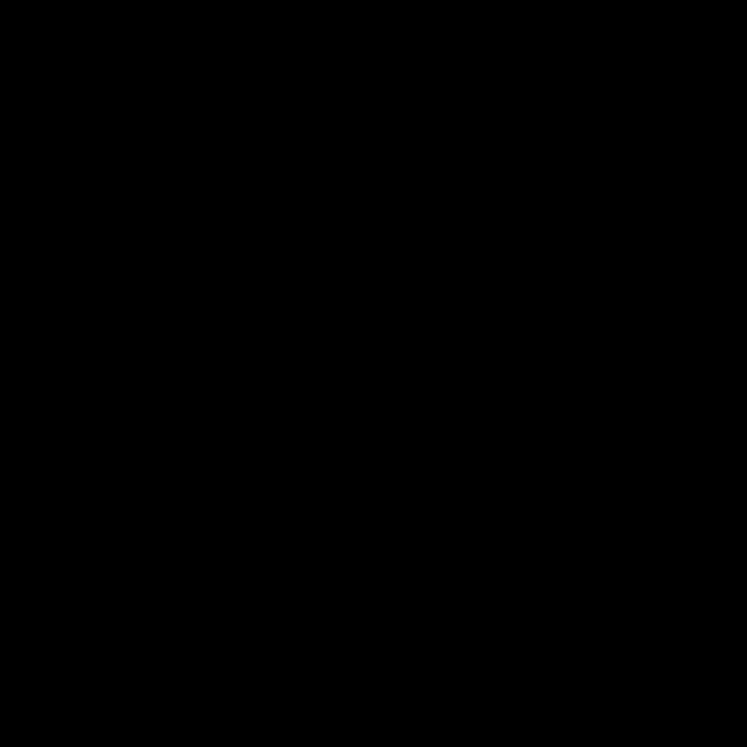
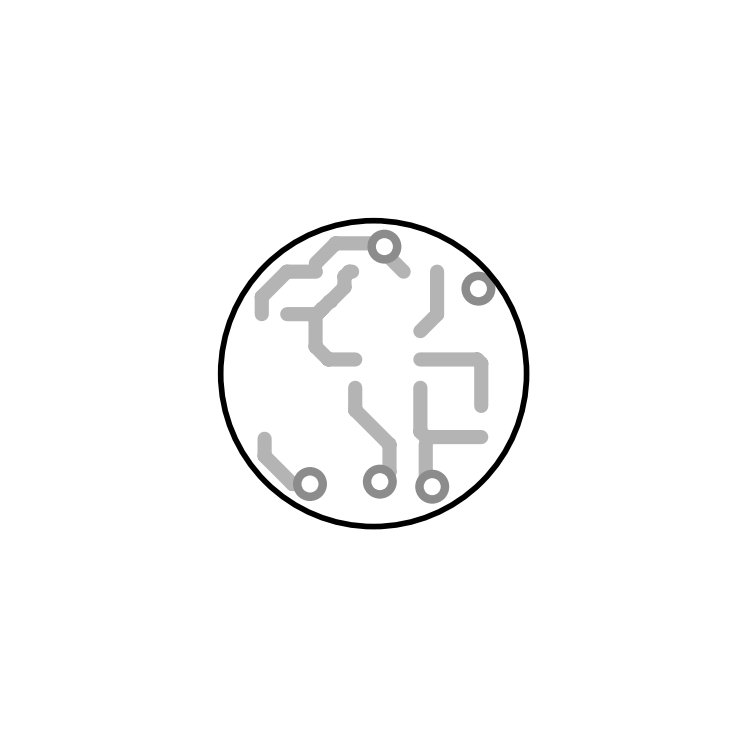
round board edge: none -> [217, 217, 530, 530]
via: none -> (384, 246)
track: none -> (315, 263) (335, 243) (375, 243) (403, 271)
track: none -> (315, 271) (286, 271) (261, 296) (261, 314)
track: none -> (352, 271) (349, 271) (344, 276) (344, 287) (315, 315) (315, 346) (328, 359) (355, 359)
track: none -> (437, 271) (437, 314) (420, 331)
via: none -> (478, 288)
track: none -> (287, 314) (317, 314)
track: none -> (420, 359) (477, 359) (481, 363) (481, 405)
track: none -> (355, 387) (355, 410) (389, 444) (389, 472) (379, 481)
track: none -> (420, 387) (420, 431) (425, 437) (481, 437)
track: none -> (264, 438) (264, 456) (292, 484) (309, 484)
track: none -> (425, 444) (425, 480) (432, 486)
via: none -> (379, 481)
via: none -> (309, 484)
via: none -> (432, 486)

